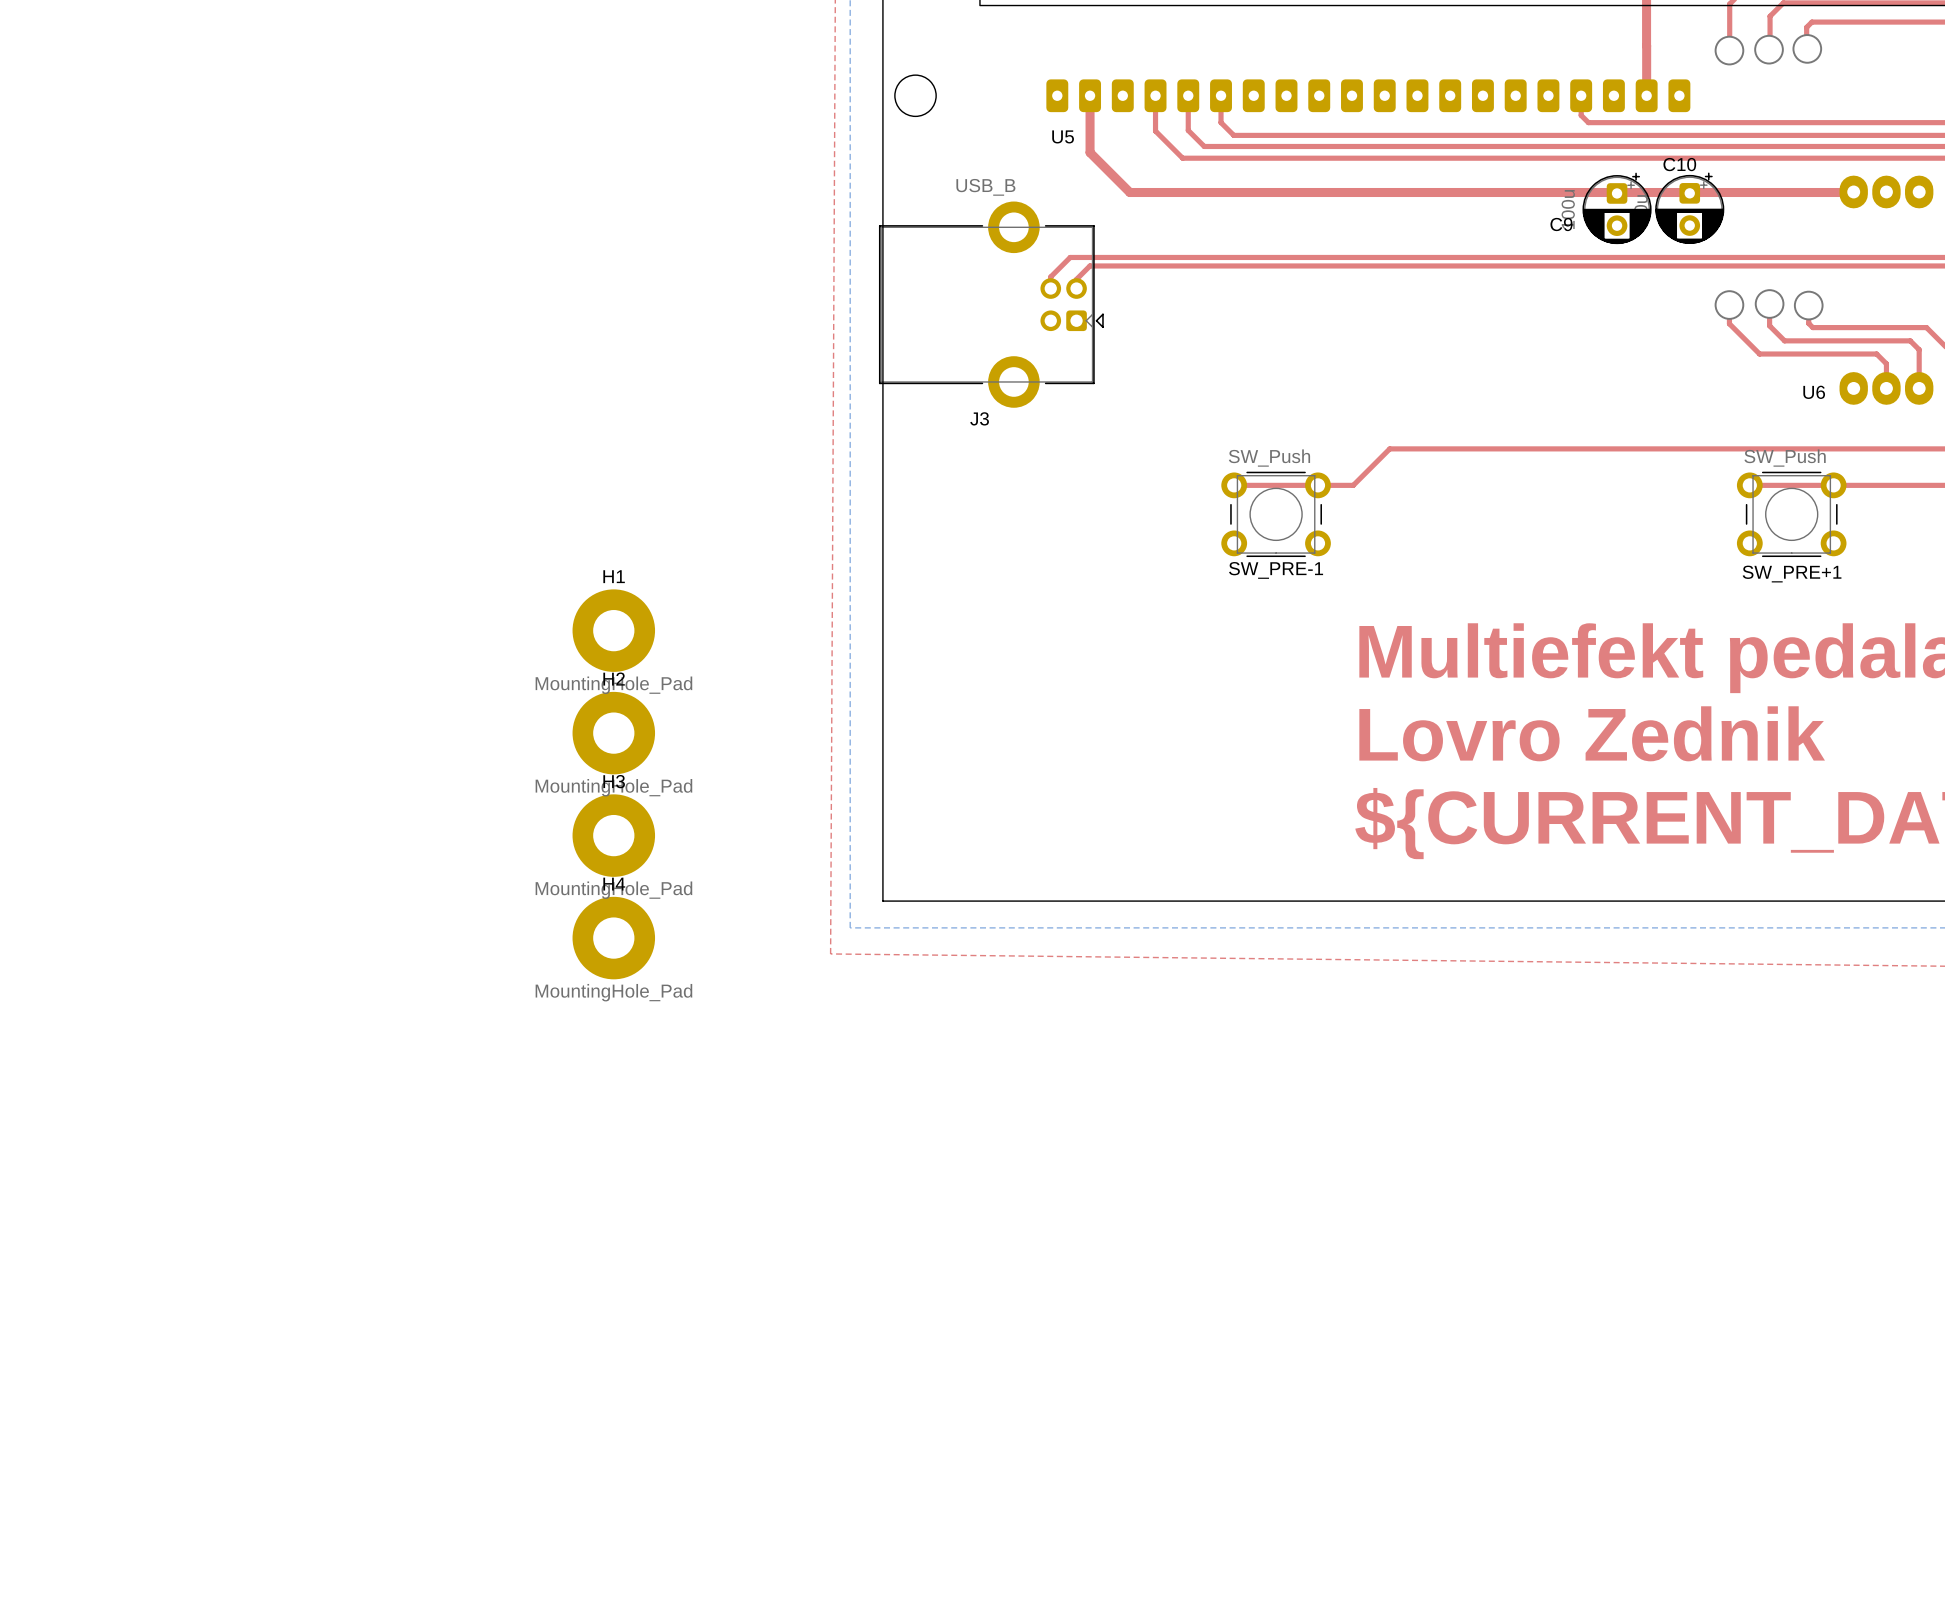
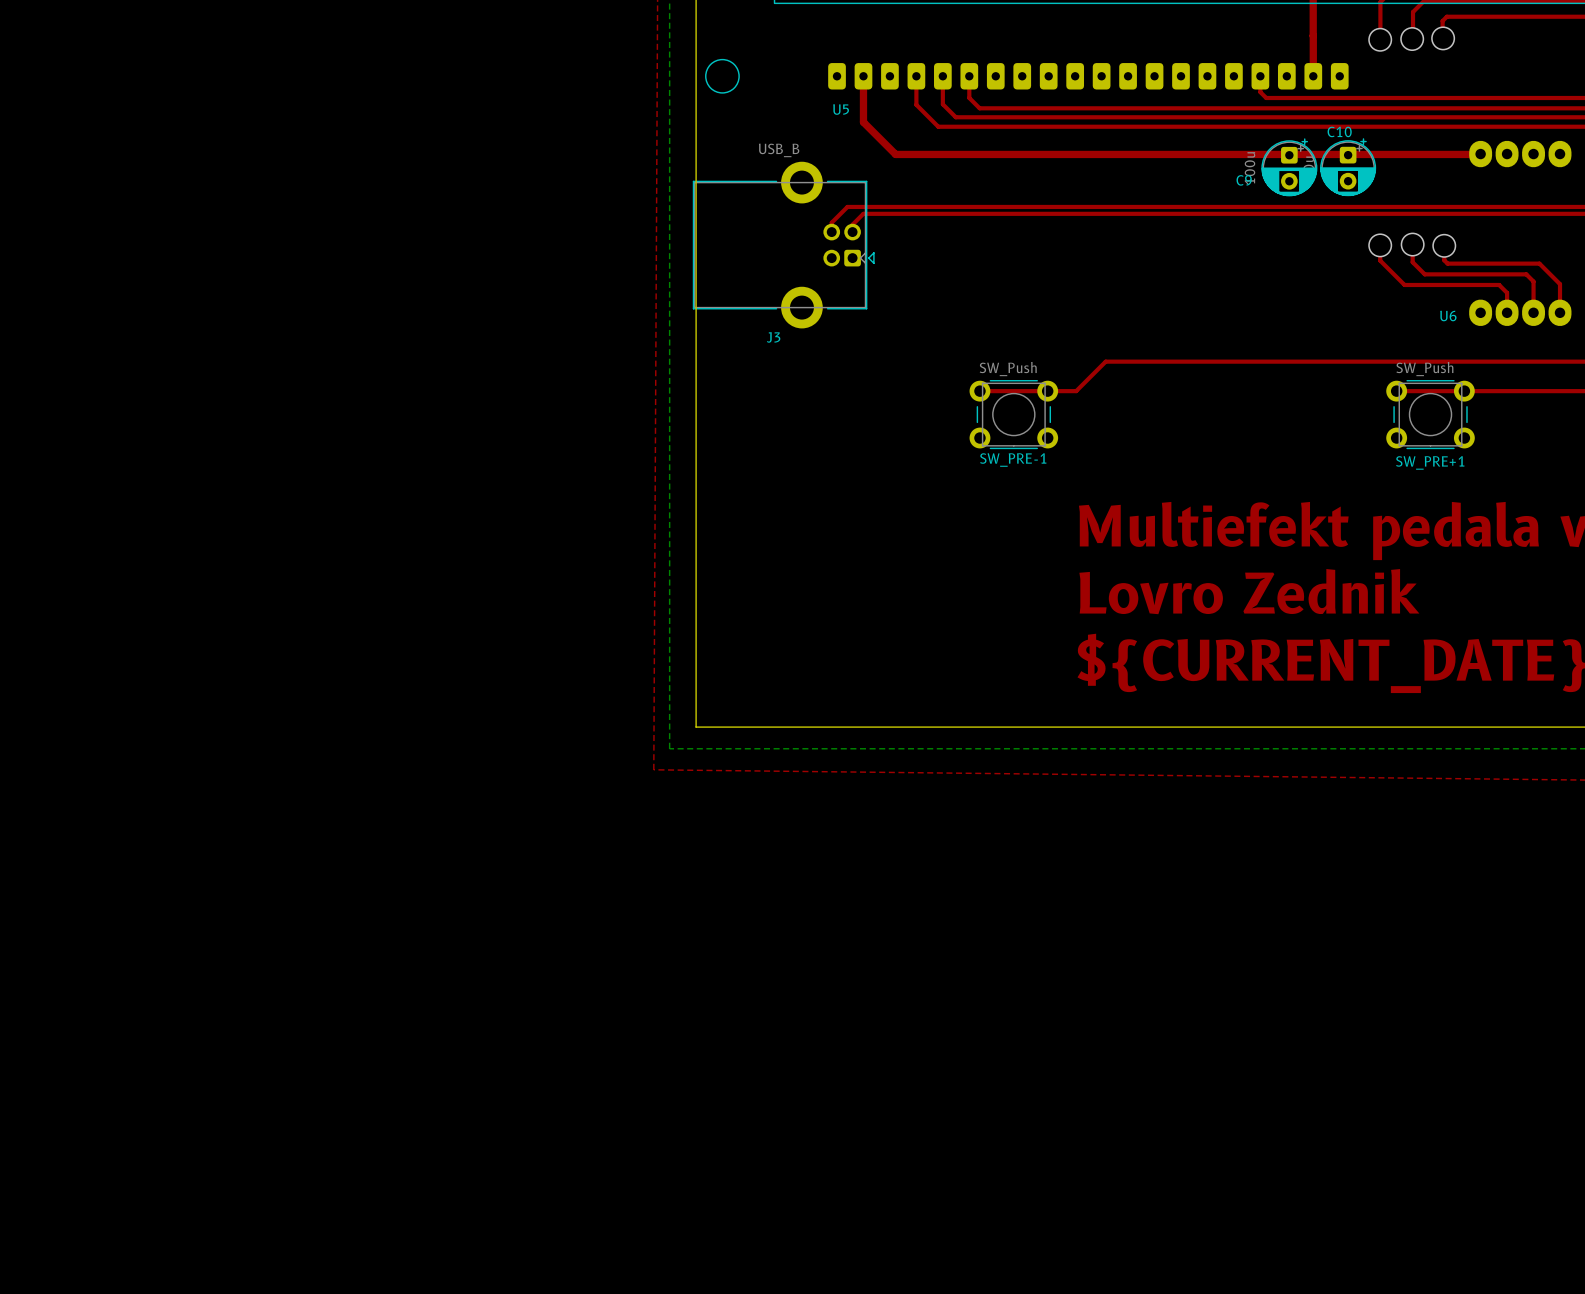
H1: MountingHole_Pad (613, 630) -> none
H2: MountingHole_Pad (613, 733) -> none
H3: MountingHole_Pad (613, 835) -> none
H4: MountingHole_Pad (613, 938) -> none

